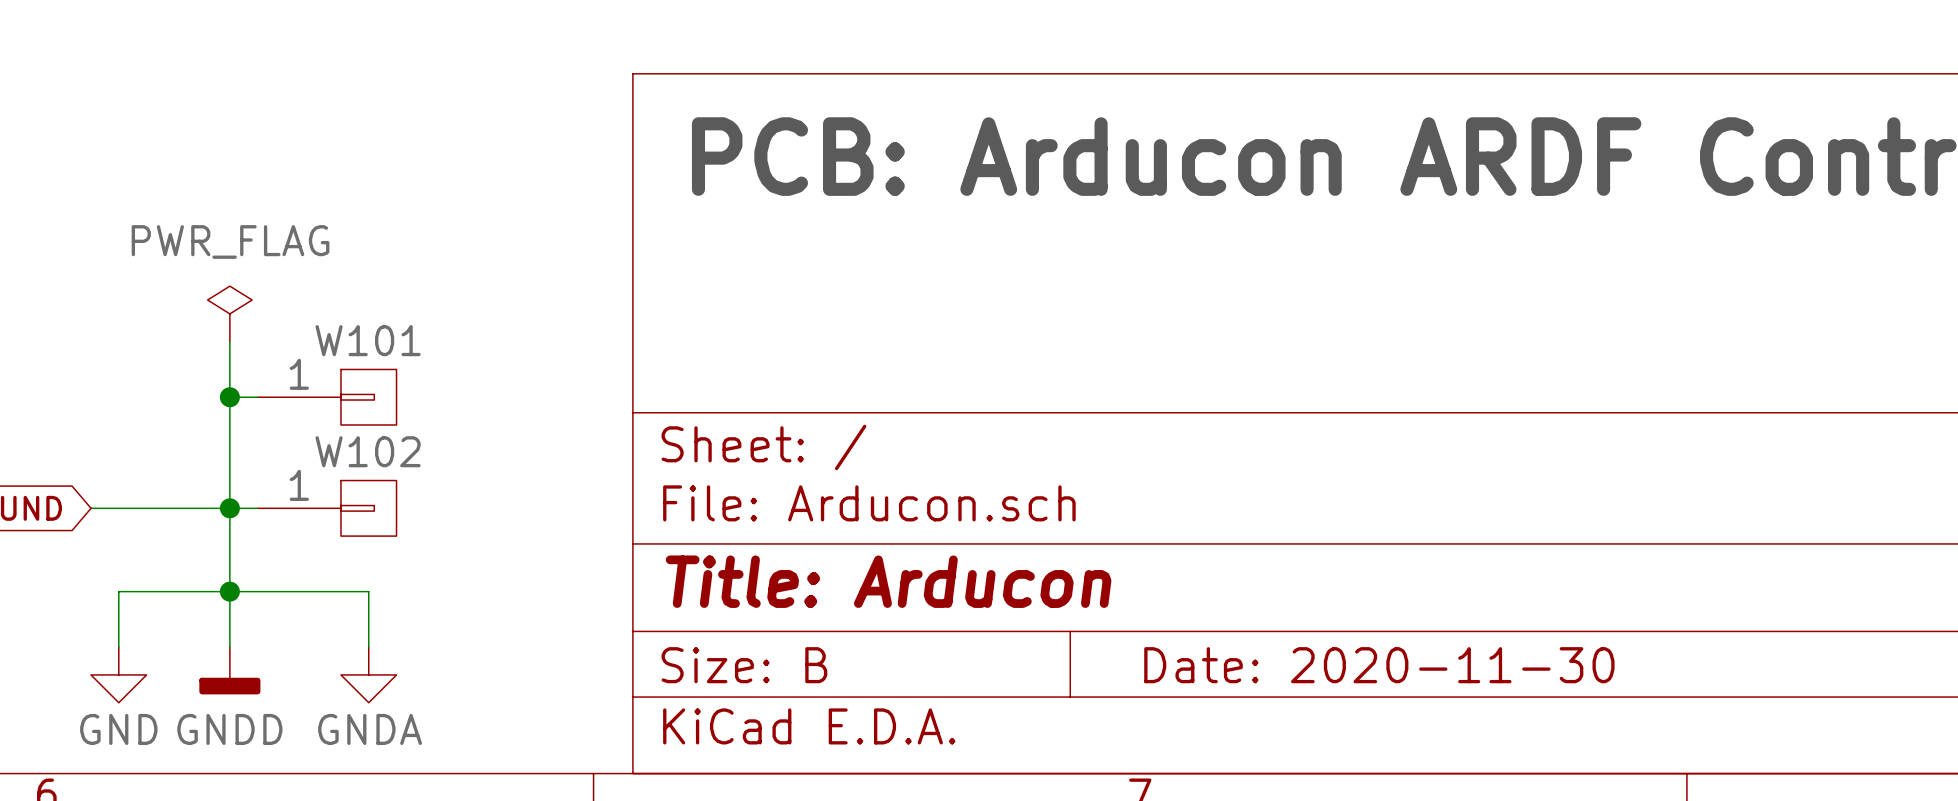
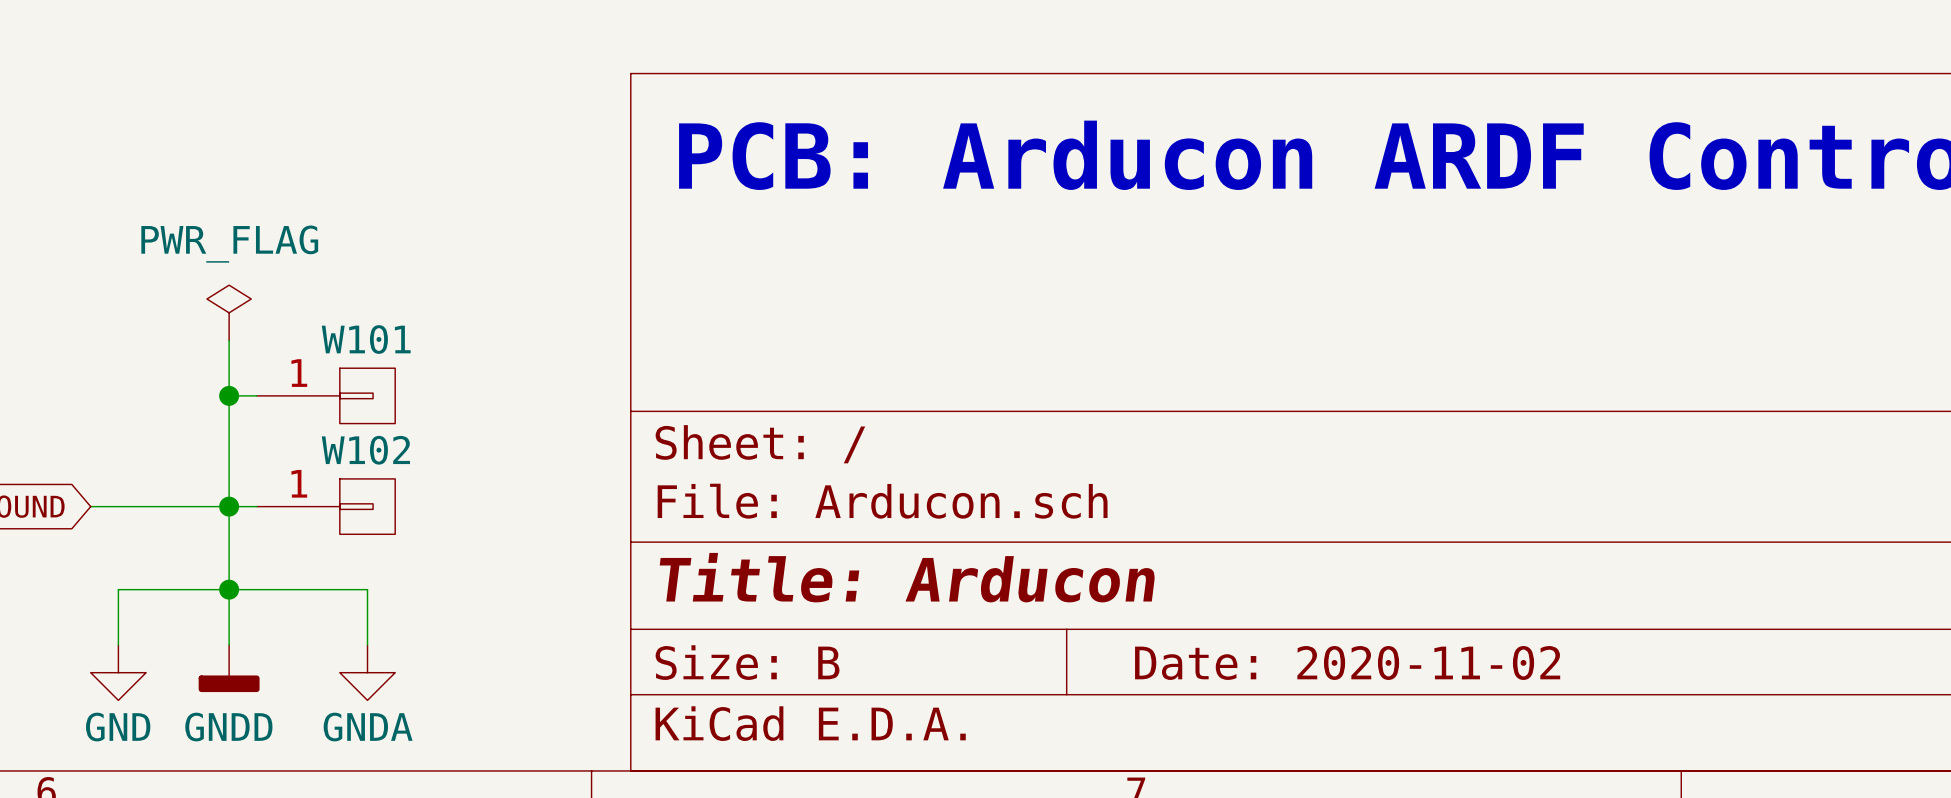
title block: Date: 2020-11-30 (1379, 665) -> Date: 2020-11-02 (1347, 662)

